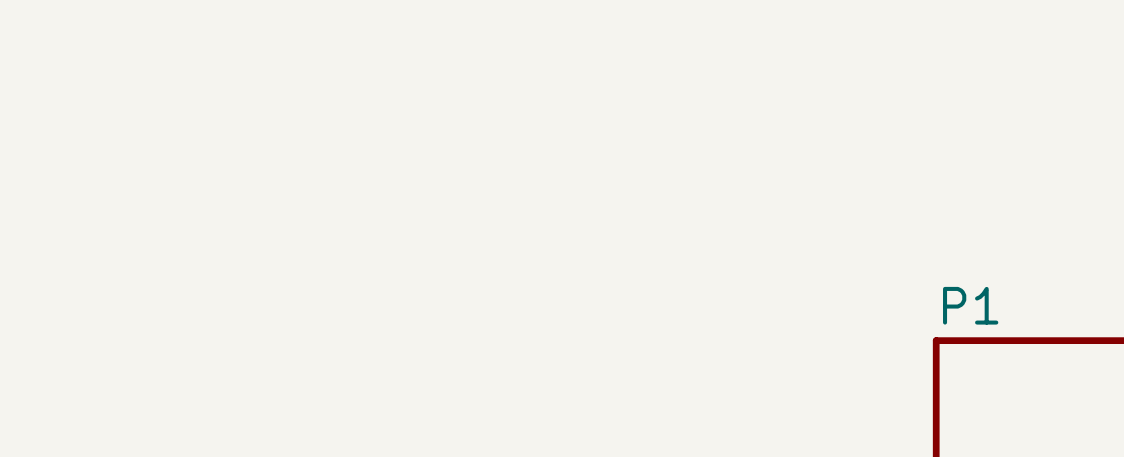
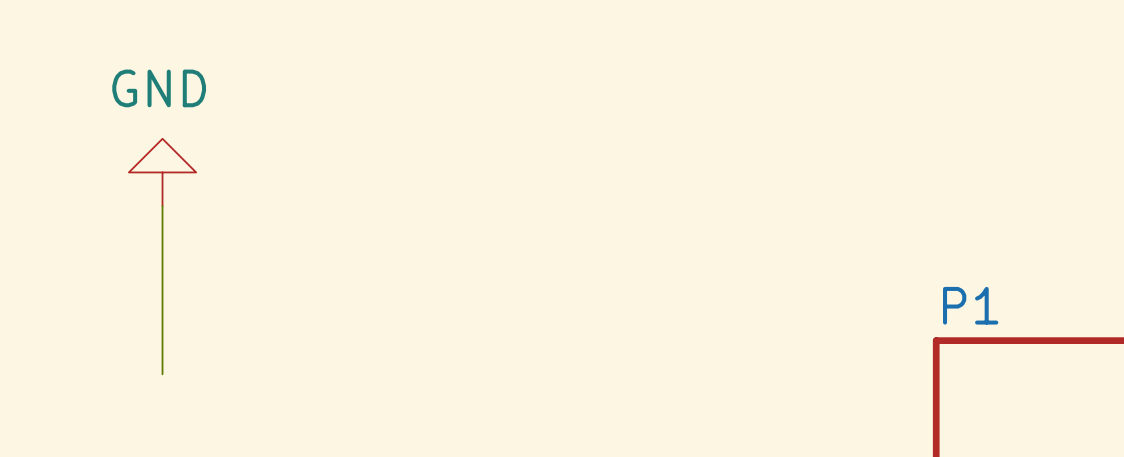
power symbol: none -> GND (162, 172)
wire: none -> (162, 206) (162, 374)

